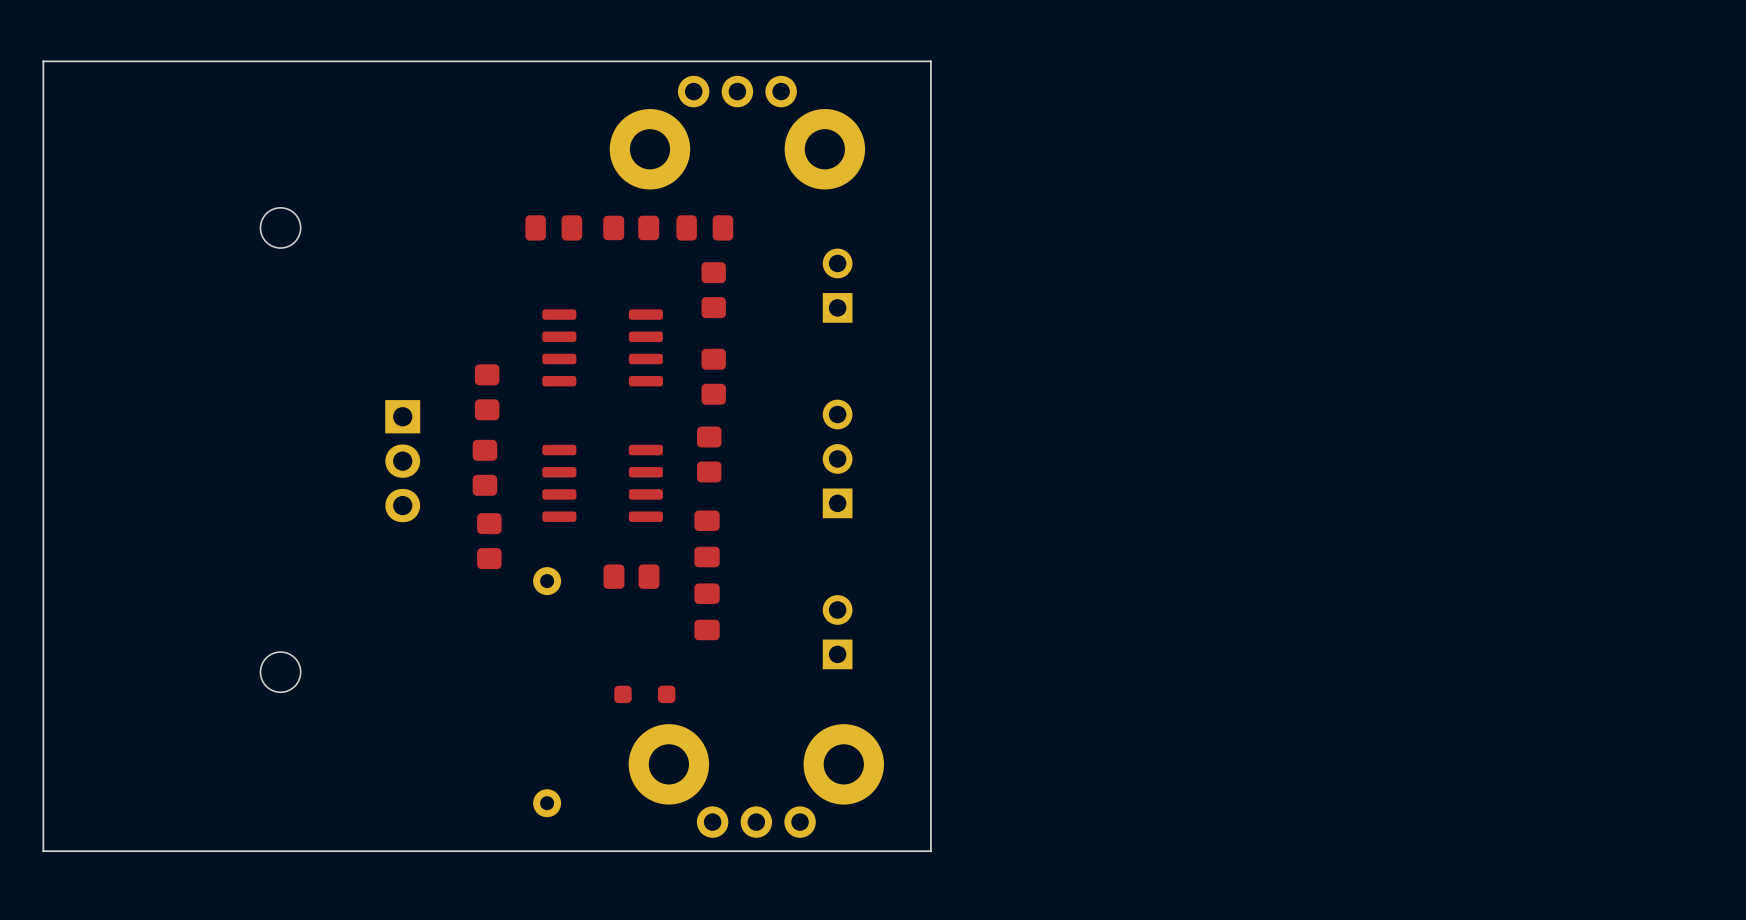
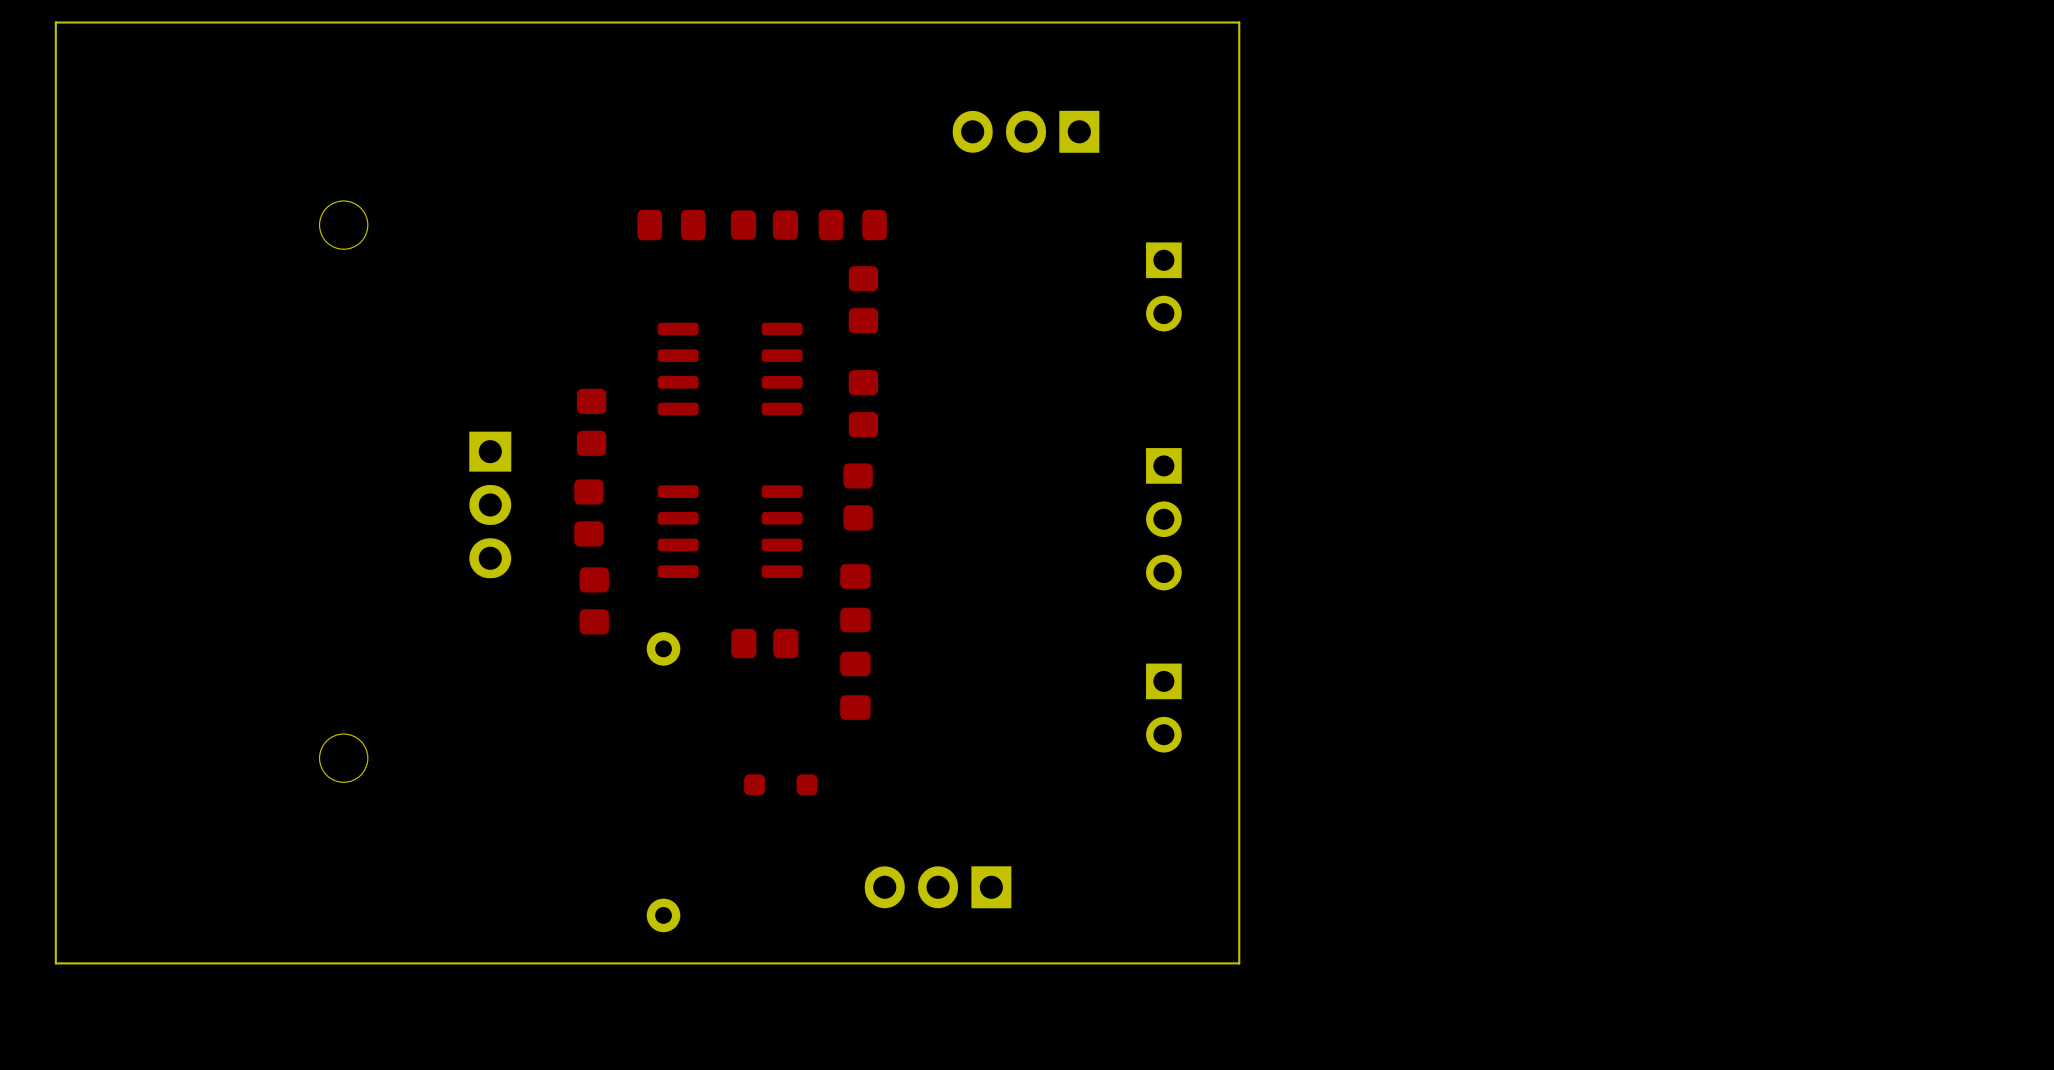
board edge: (930, 61) (43, 61) (43, 851) (930, 851) (930, 61) -> (1239, 22) (1239, 963) (55, 963) (55, 22) (1239, 22)
part: (737, 132) -> none
part: none -> (1026, 131)
part rotation: 0° (837, 285) -> 180° (1163, 286)
part position: (837, 285) -> (1163, 286)
part rotation: 0° (837, 458) -> 180° (1163, 519)
part position: (837, 458) -> (1163, 519)
part rotation: 0° (837, 632) -> 180° (1163, 708)
part position: (837, 632) -> (1163, 708)
part: none -> (938, 887)
part: (756, 780) -> none

